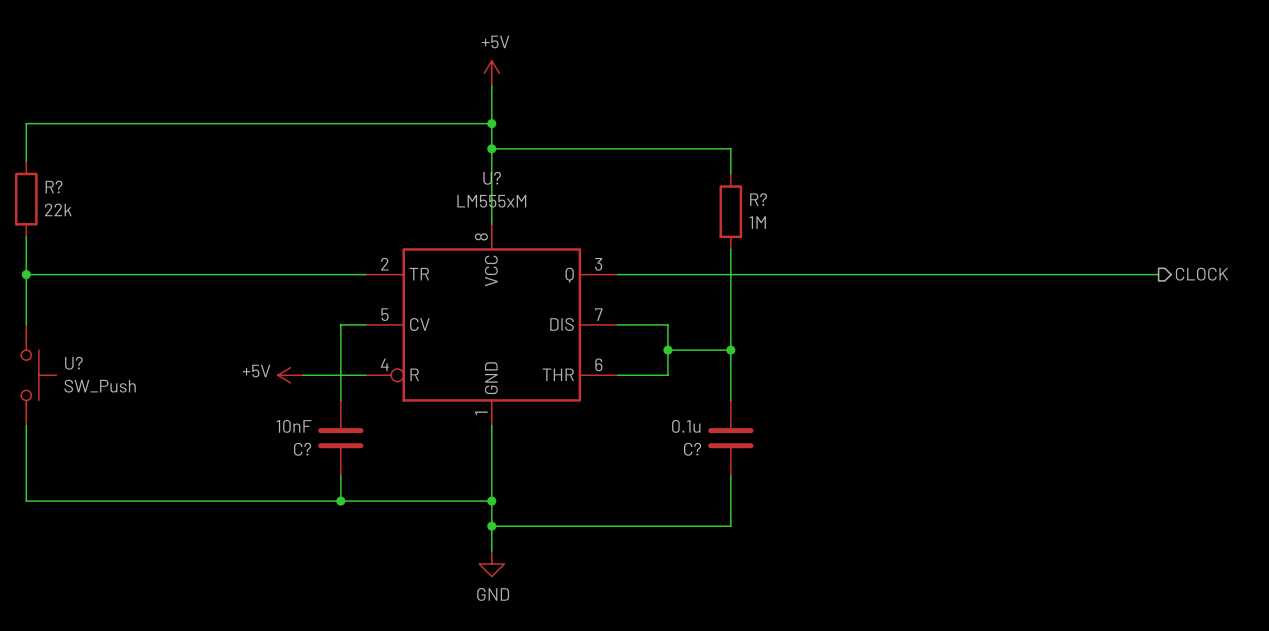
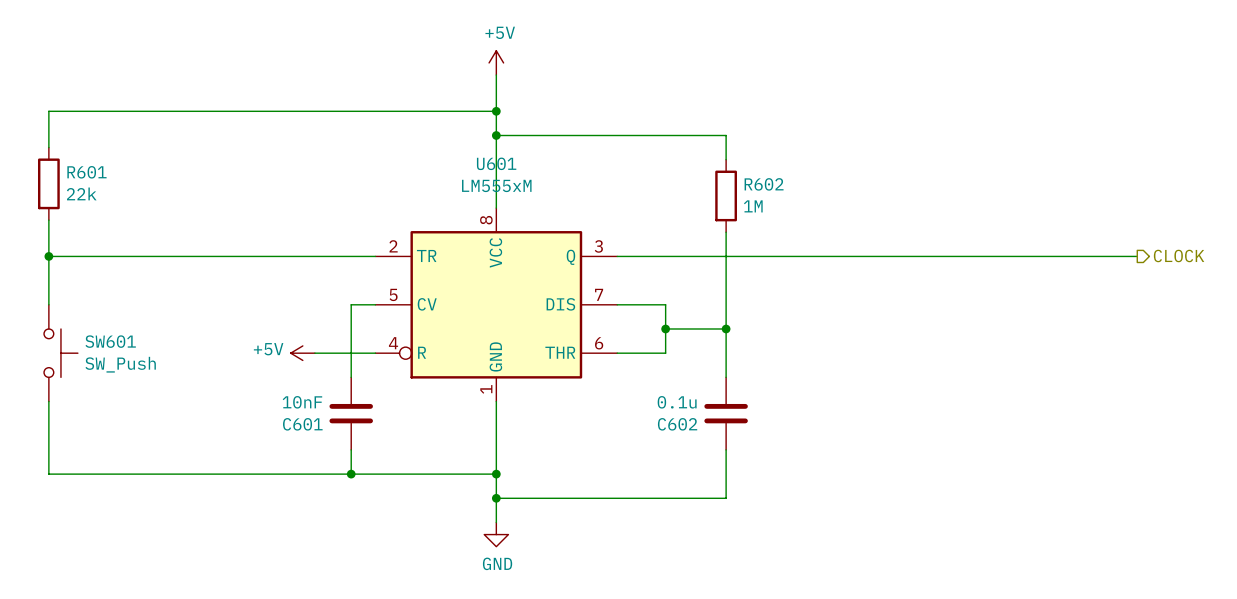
U? name: U? (492, 178) -> U601 (496, 163)
R? name: R? (54, 187) -> R601 (86, 172)
R? name: R? (758, 199) -> R602 (764, 184)
U? name: U? (73, 363) -> SW601 (110, 341)
C? name: C? (302, 449) -> C601 (302, 424)
C? name: C? (692, 449) -> C602 (677, 424)

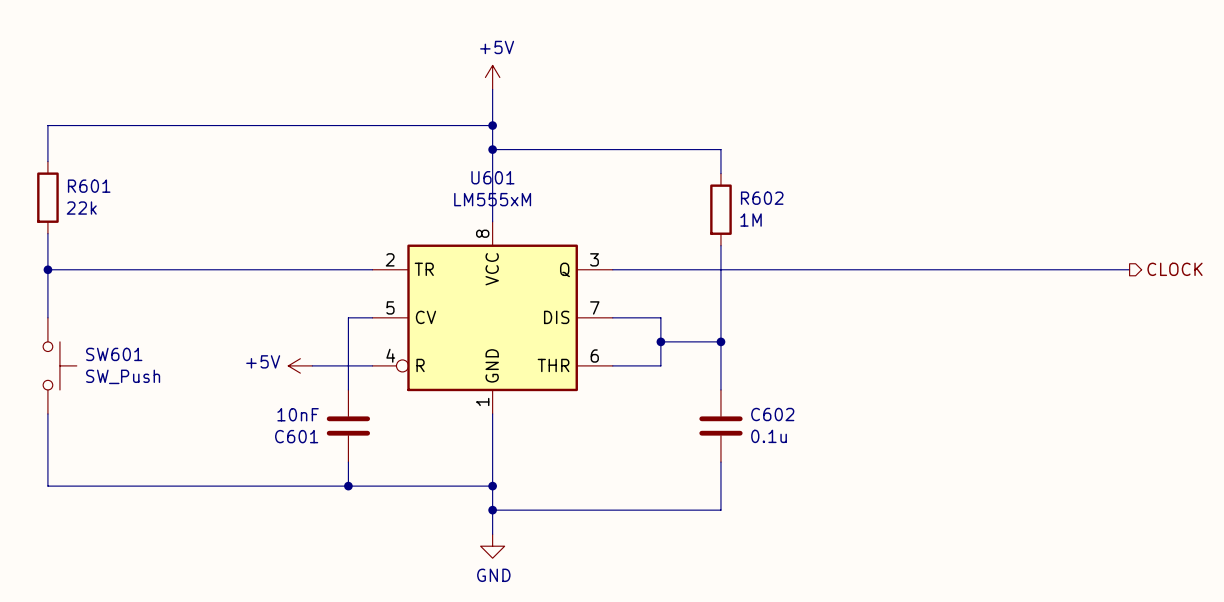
C602 value position: 0.1u (677, 402) -> 0.1u (769, 436)
C602 name position: C602 (677, 424) -> C602 (772, 414)

